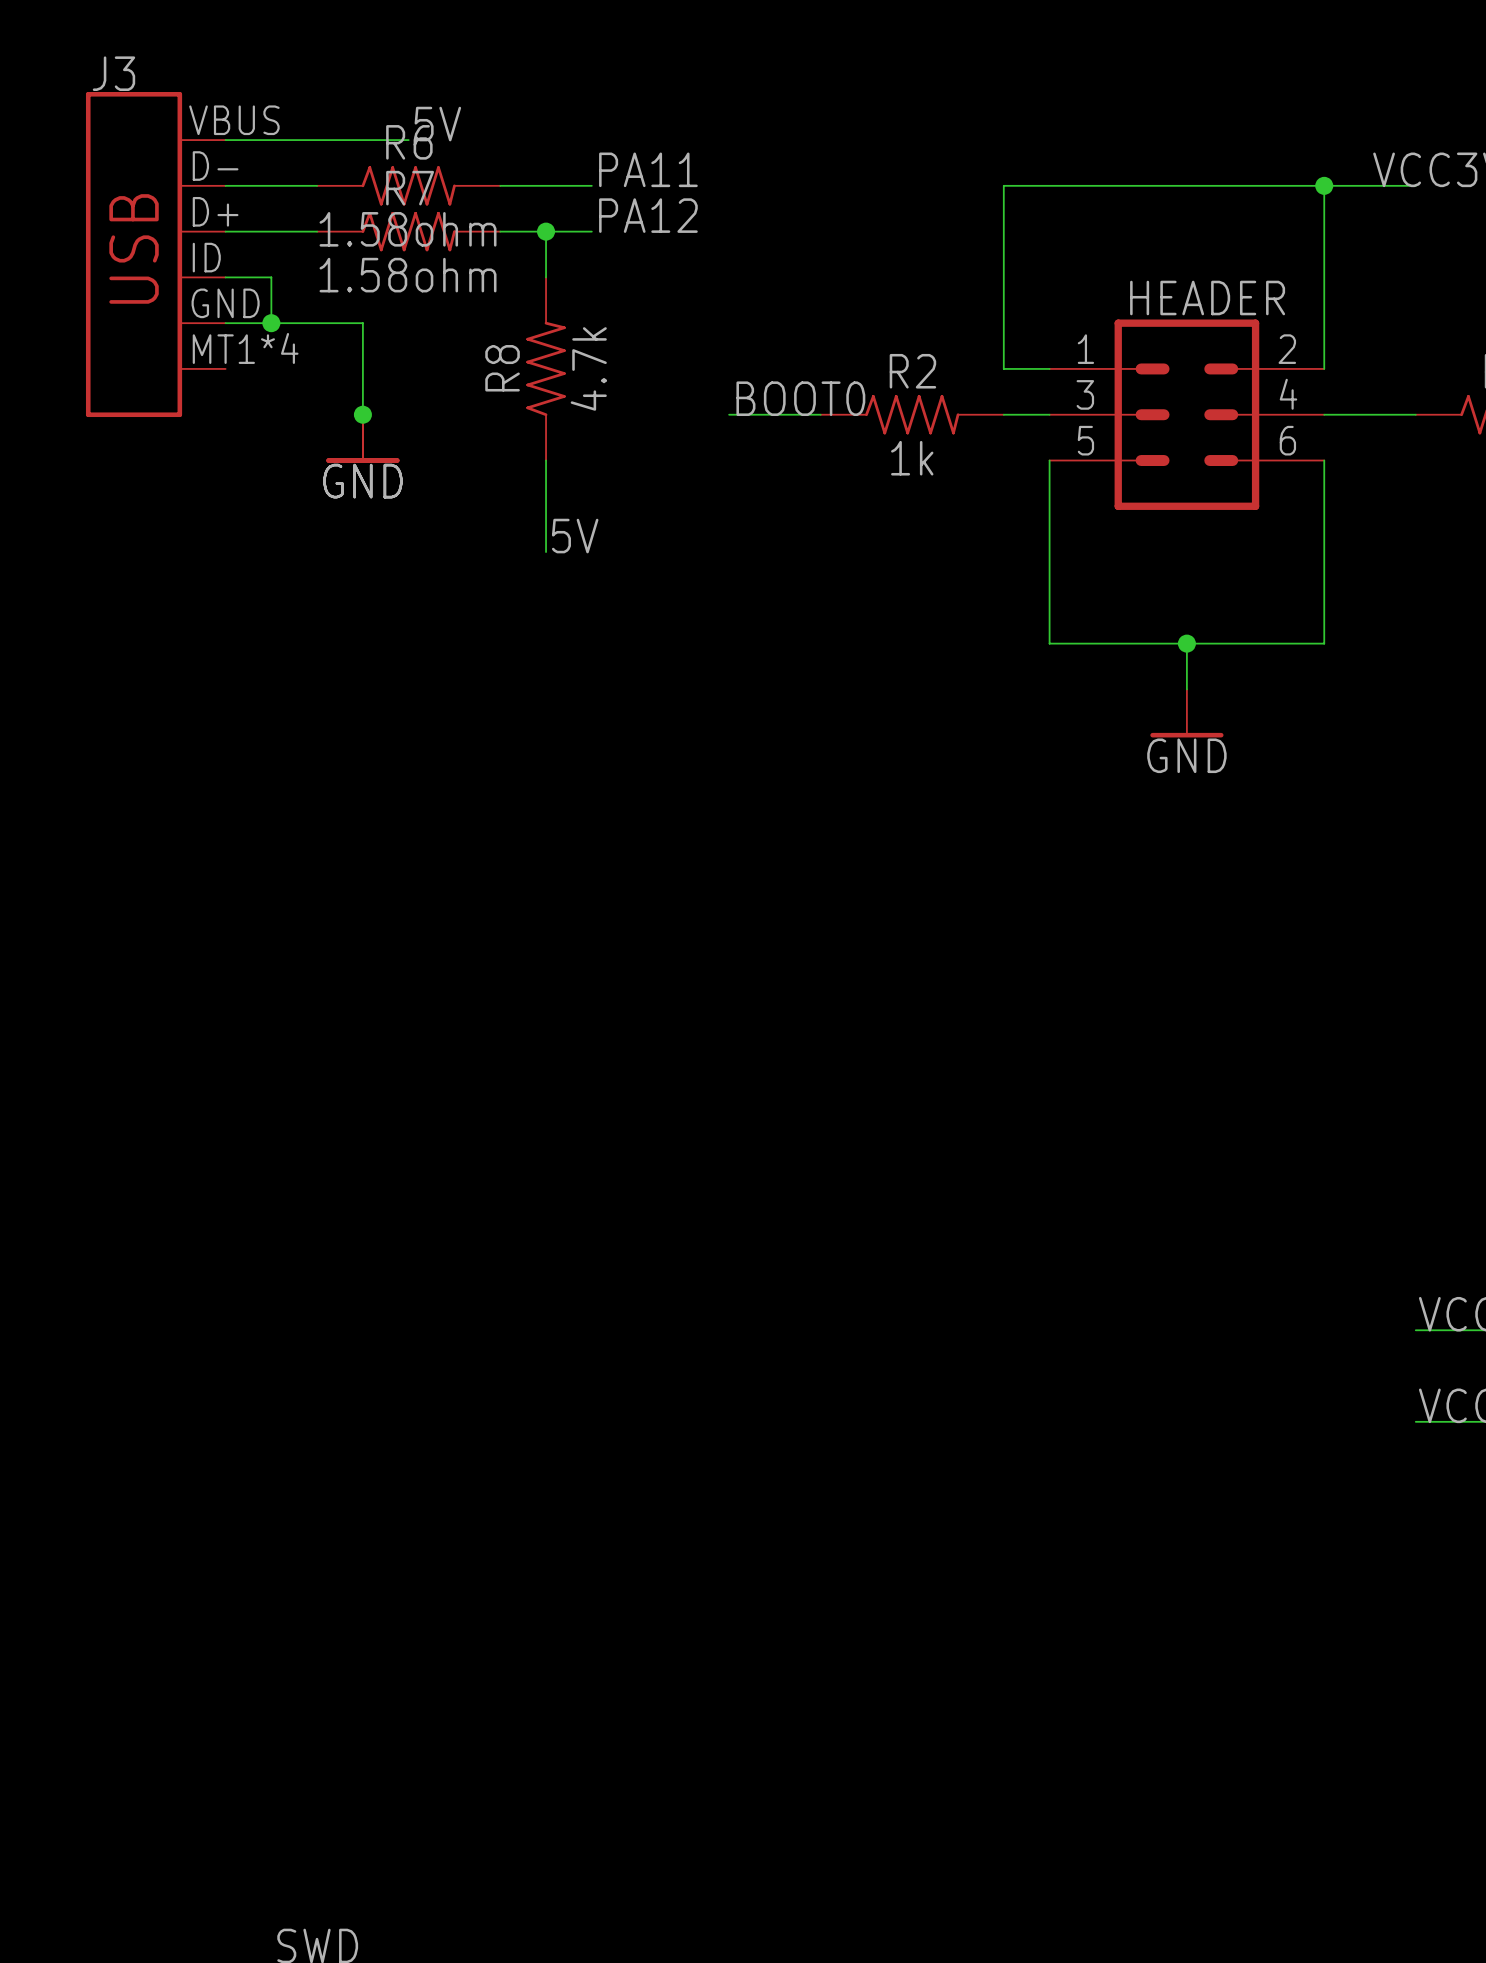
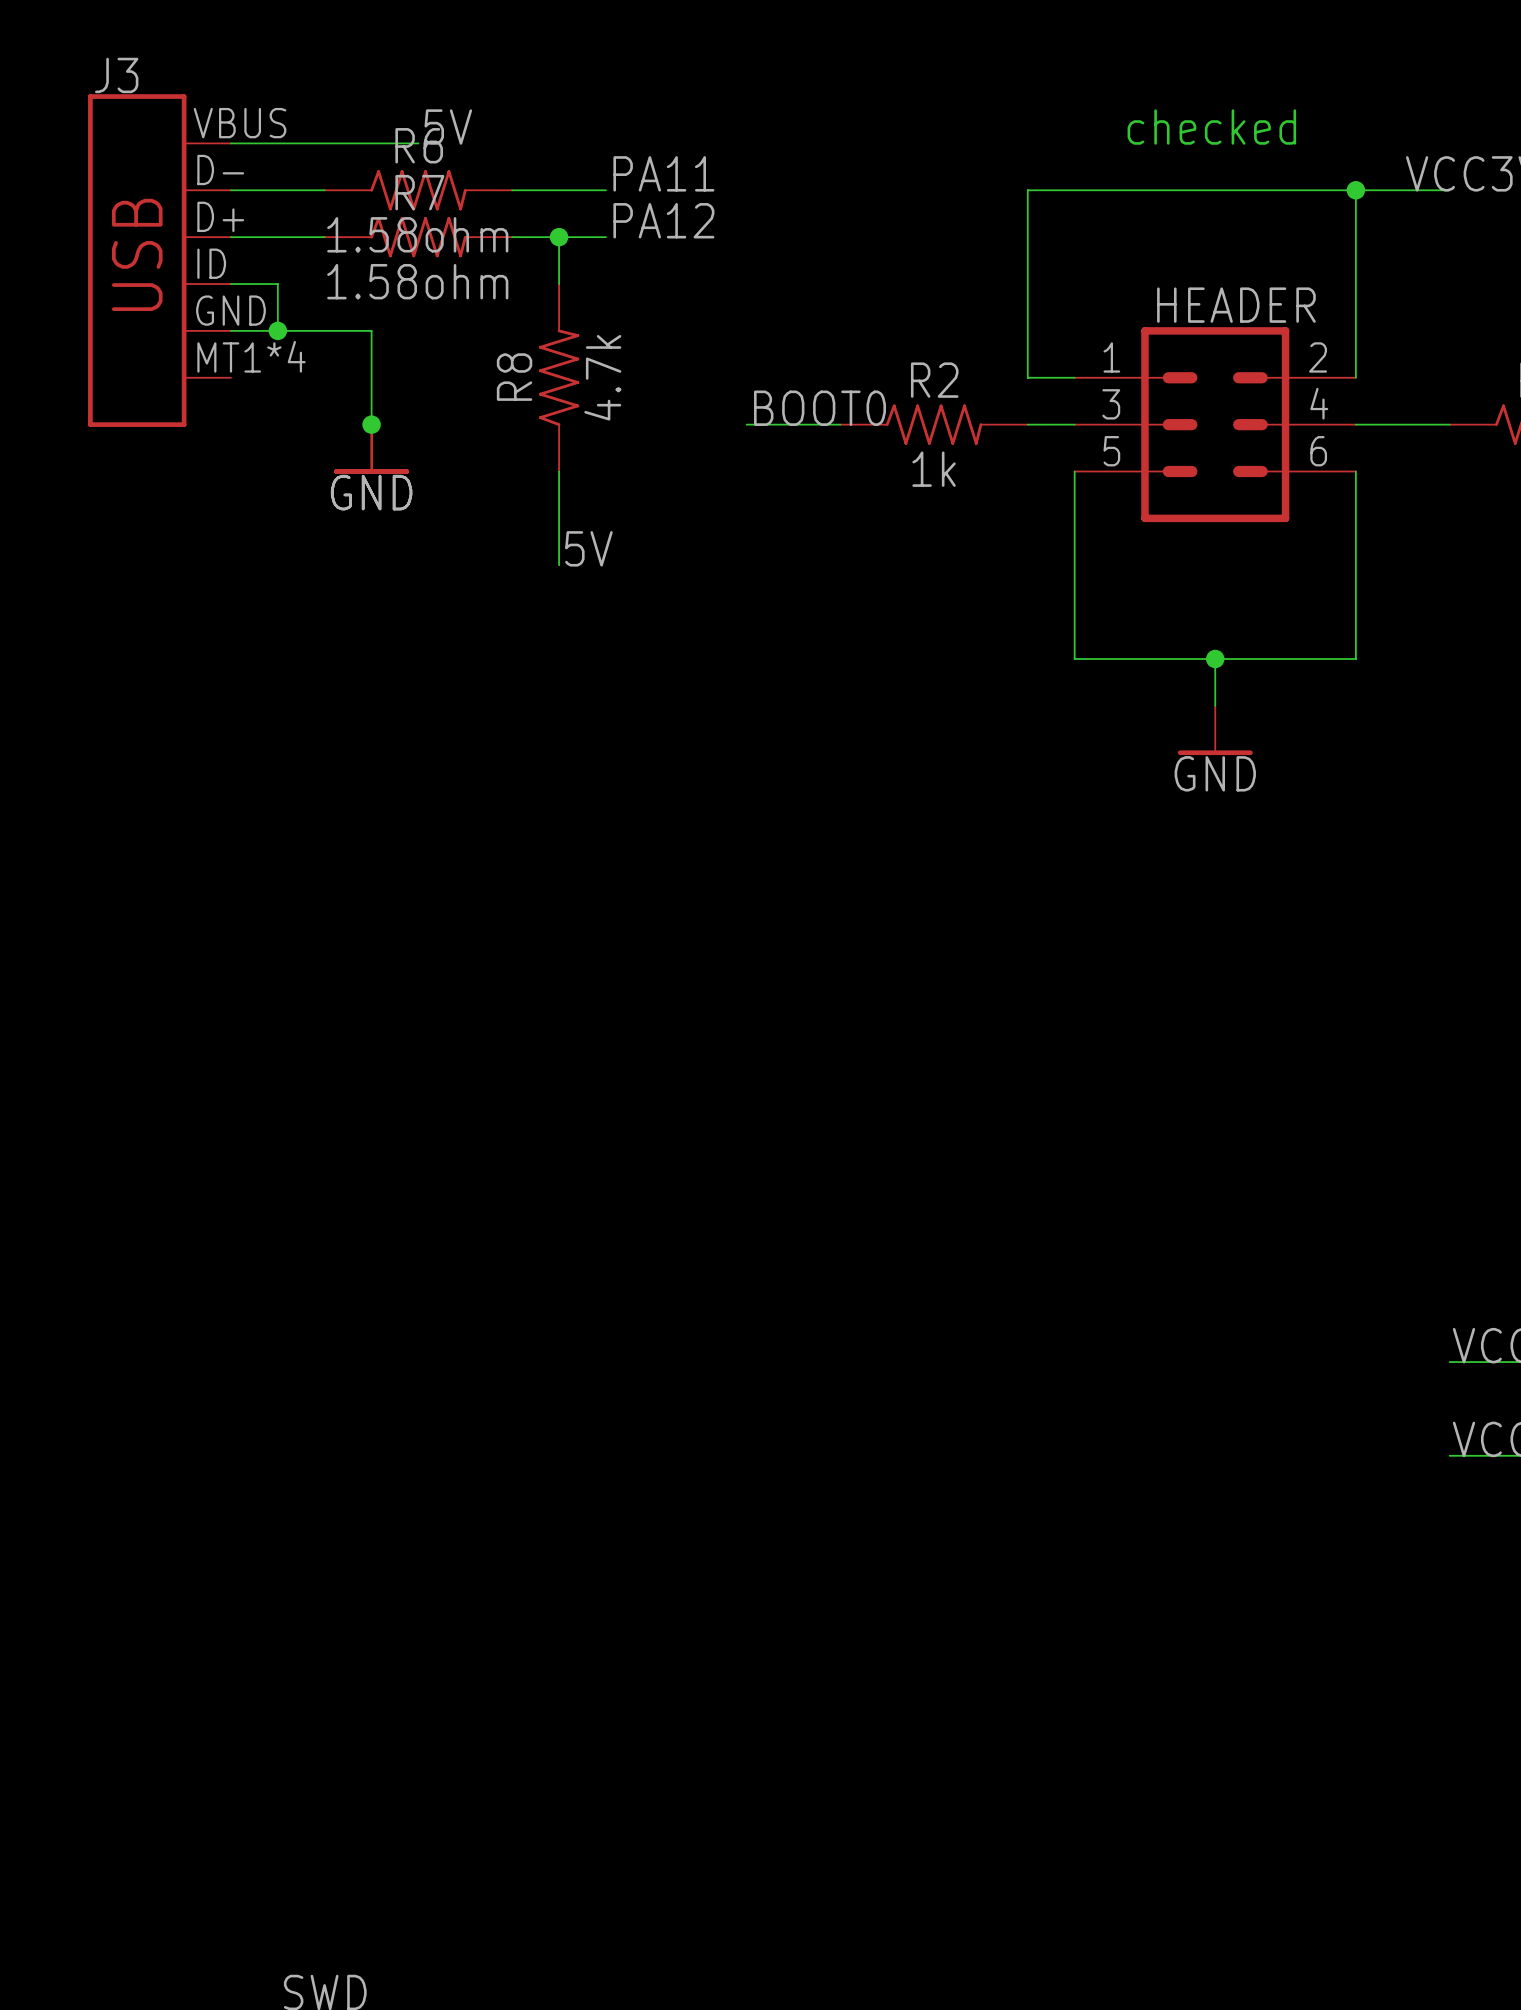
text: none -> checked (1211, 127)

